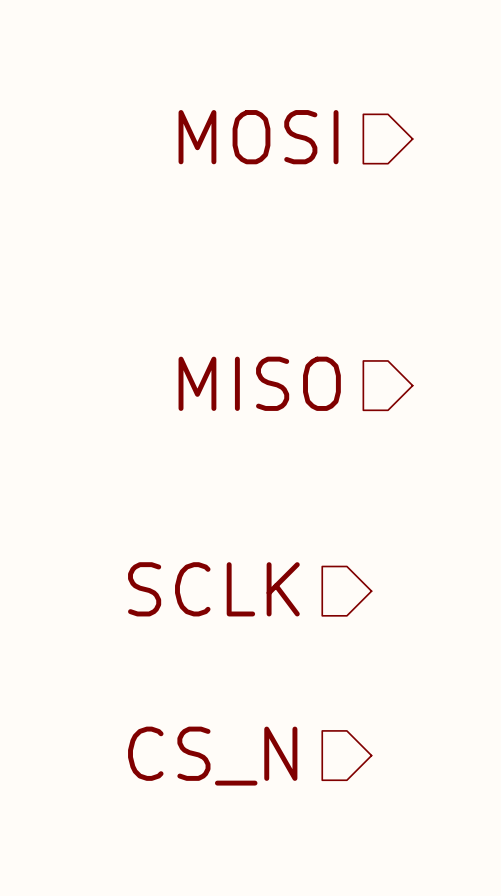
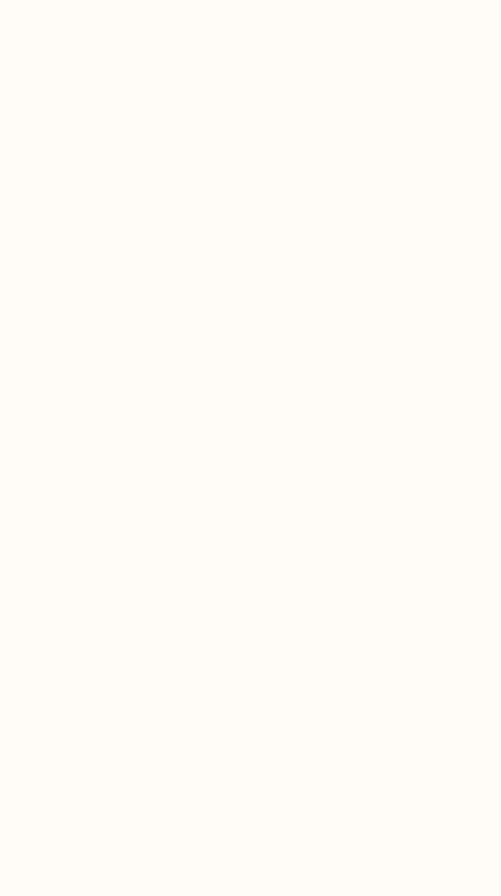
hierarchical label: MOSI (258, 137) -> none
hierarchical label: MISO (259, 383) -> none
hierarchical label: SCLK (213, 589) -> none
hierarchical label: CS_N (212, 756) -> none

